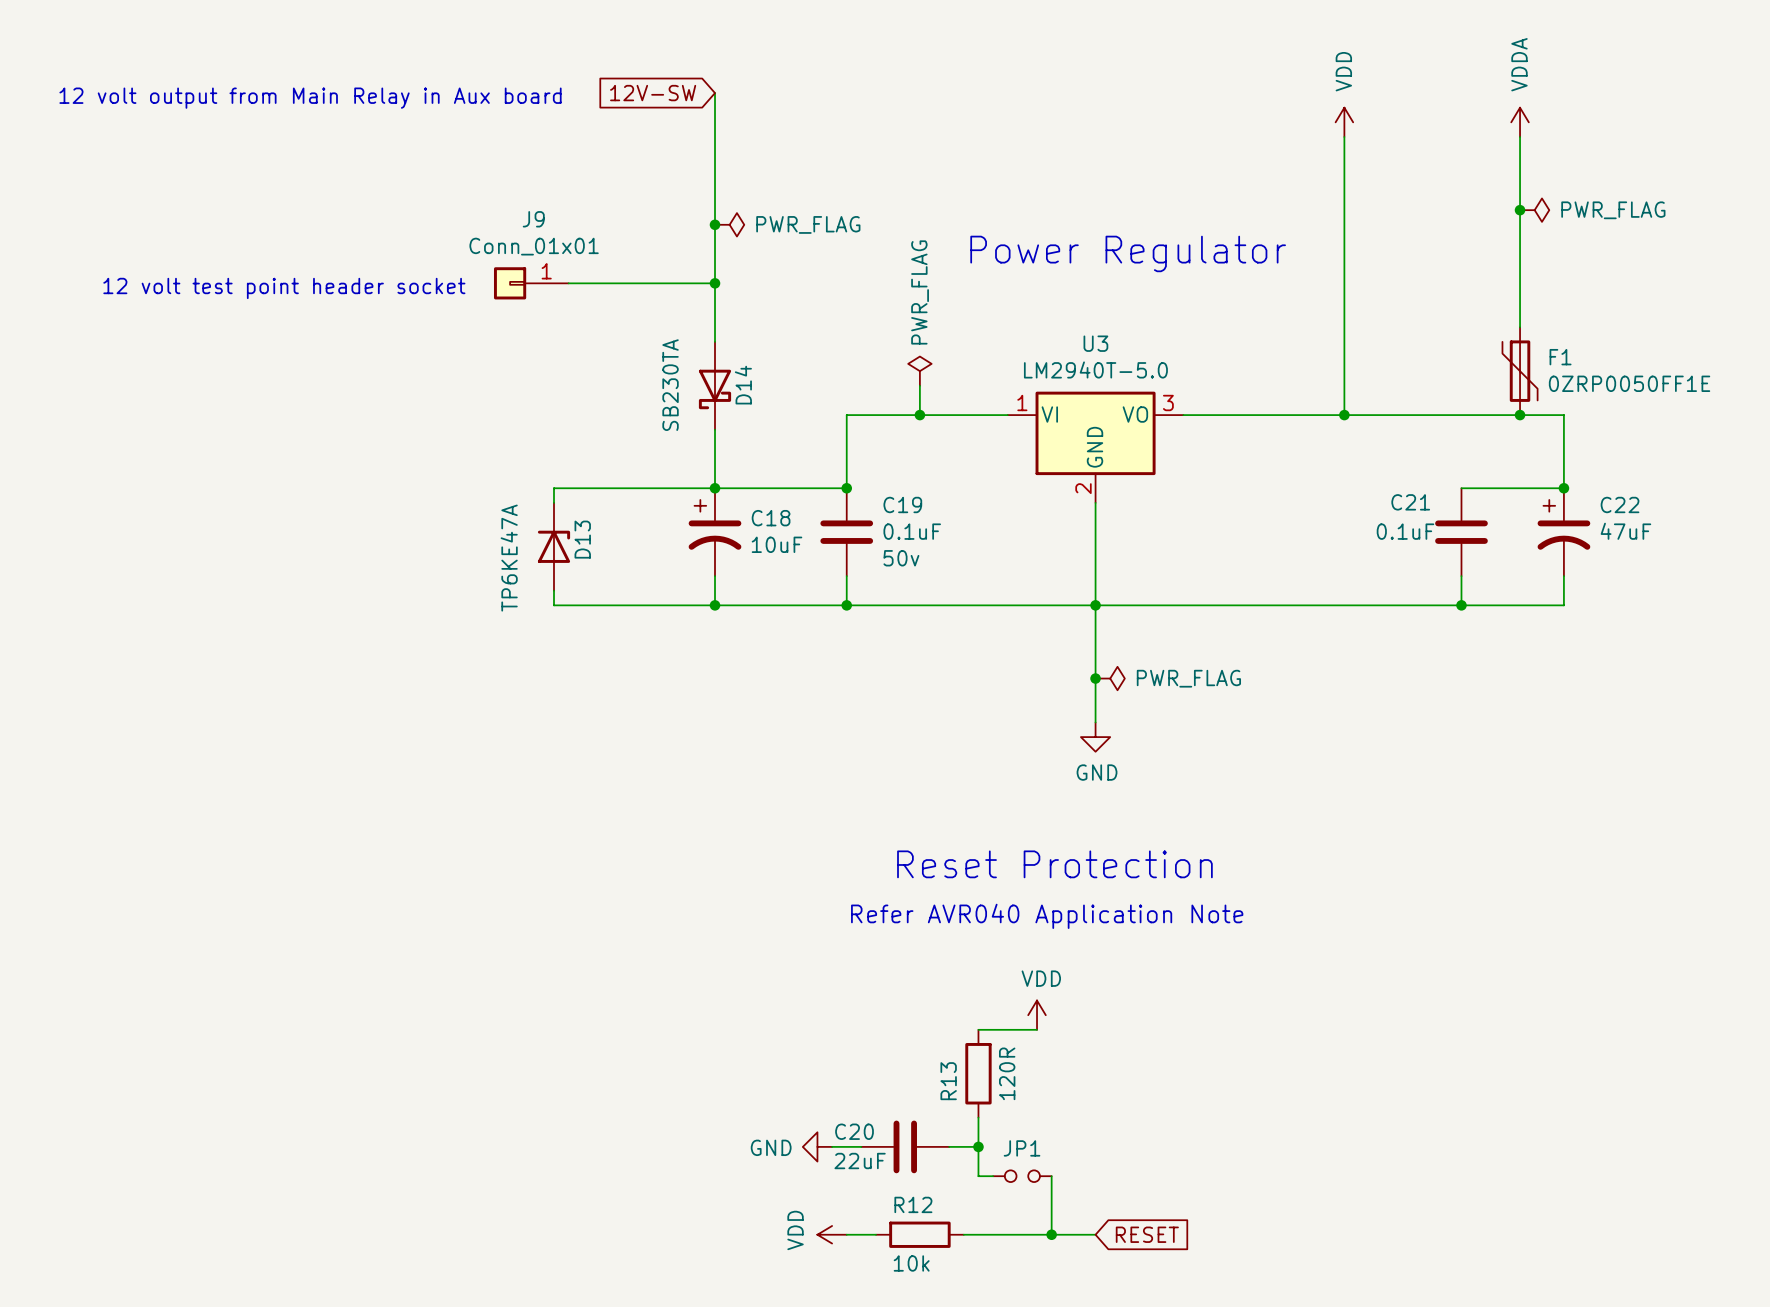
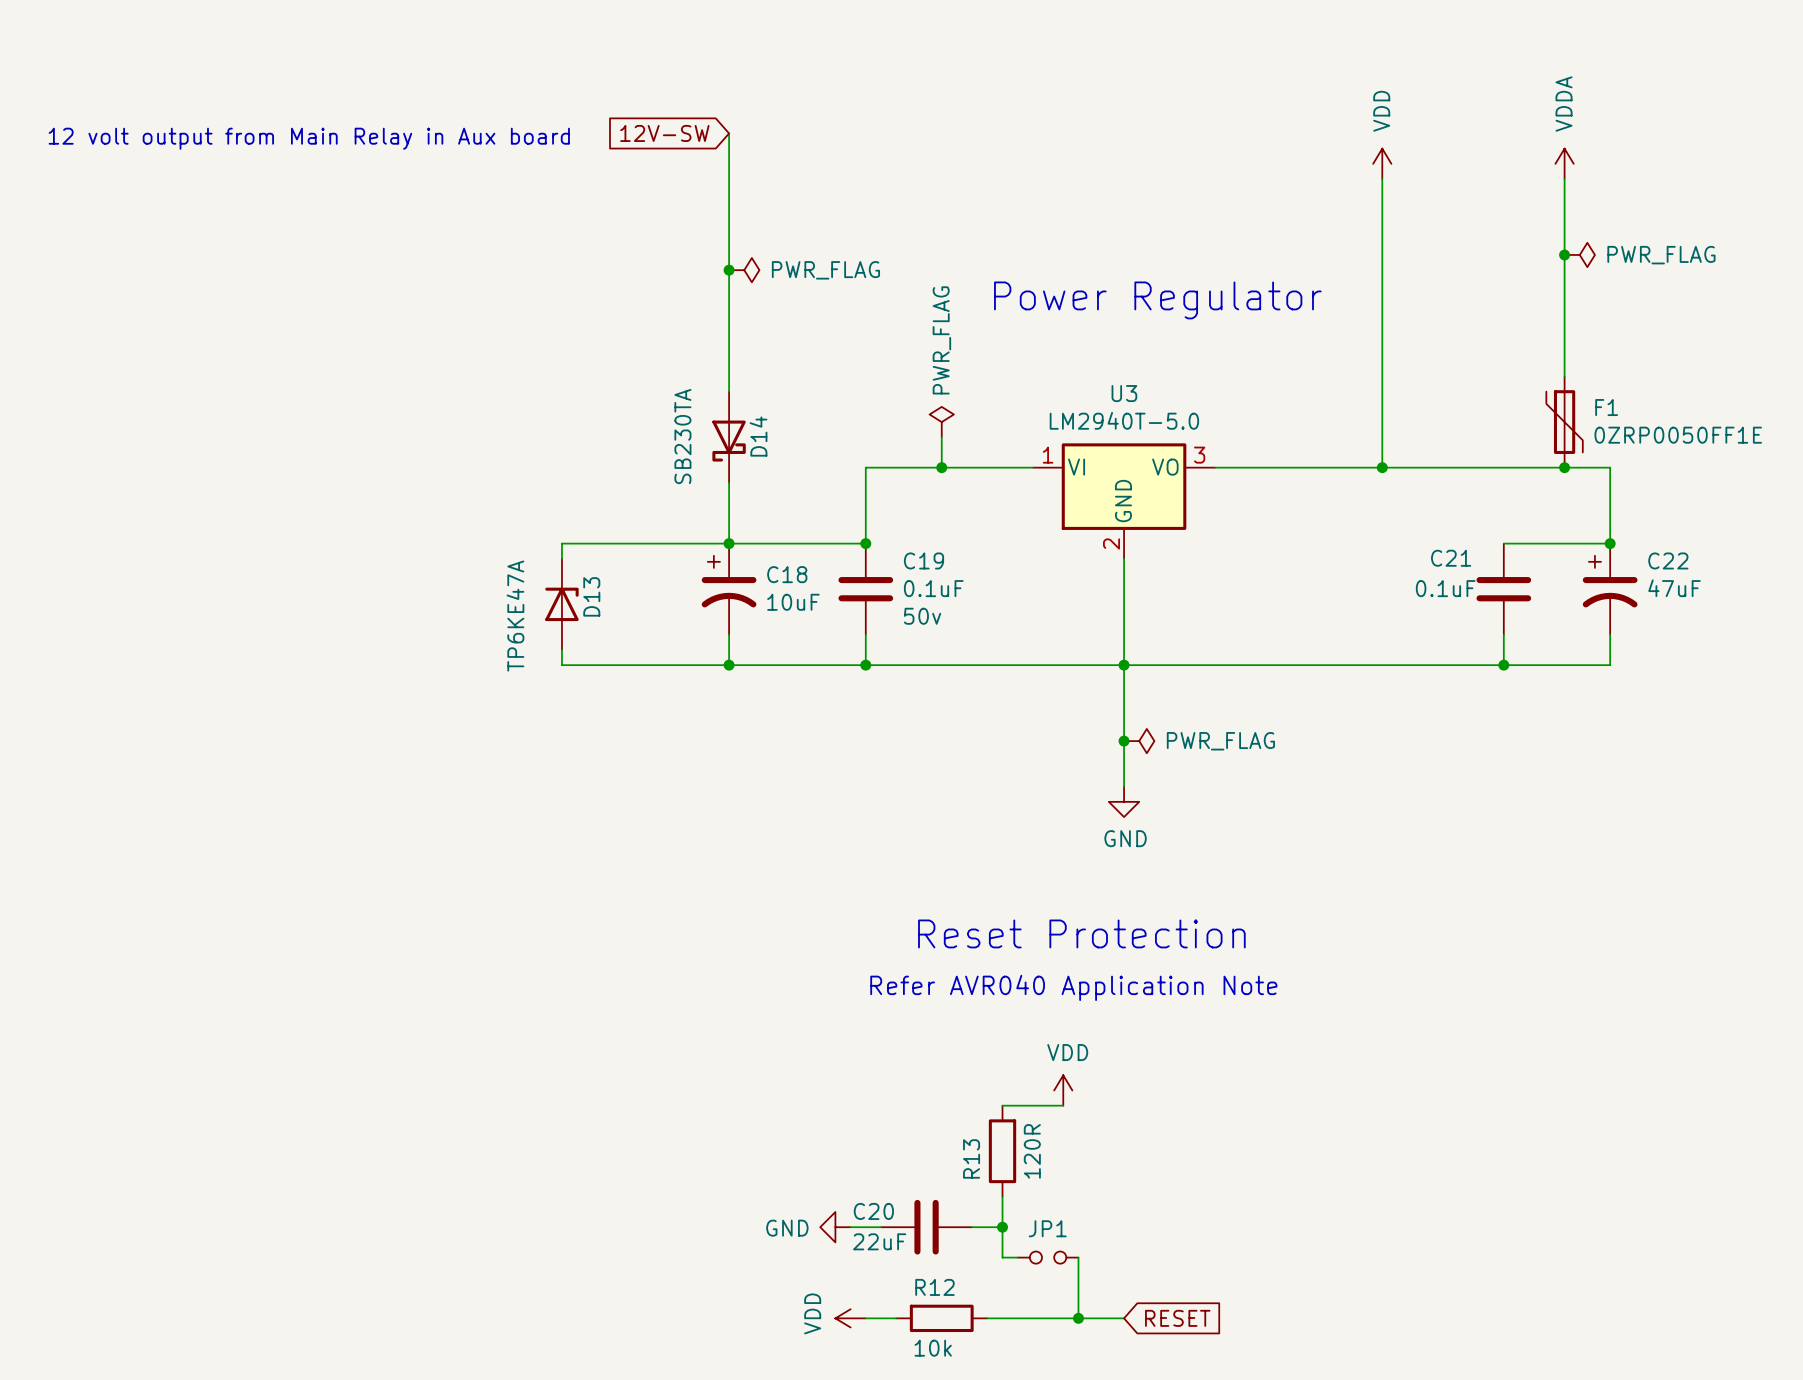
J9: Conn_01x01 (531, 283) -> none
wire: (568, 283) (715, 283) -> none
junction: (715, 283) -> none
text: 12 volt test point header socket (284, 288) -> none

